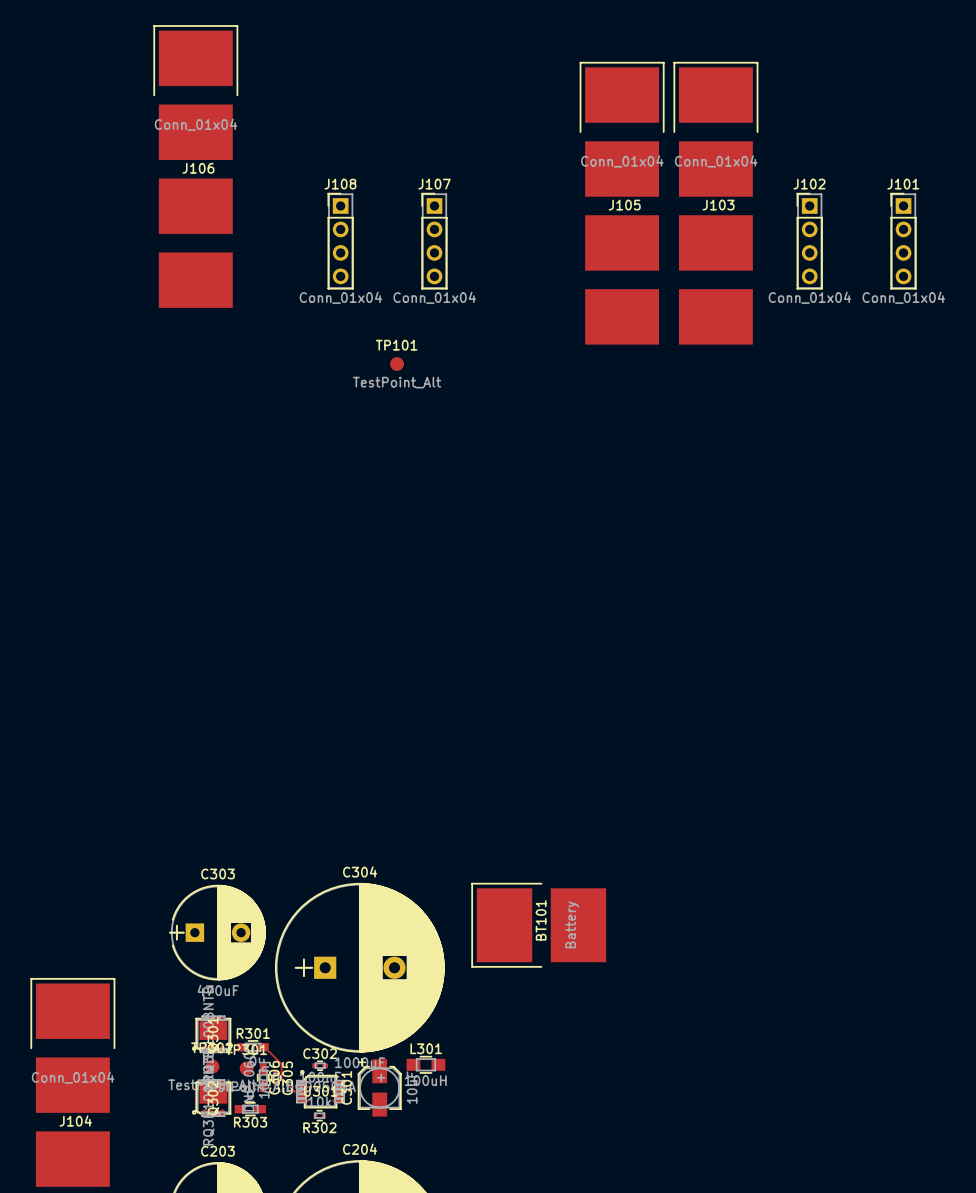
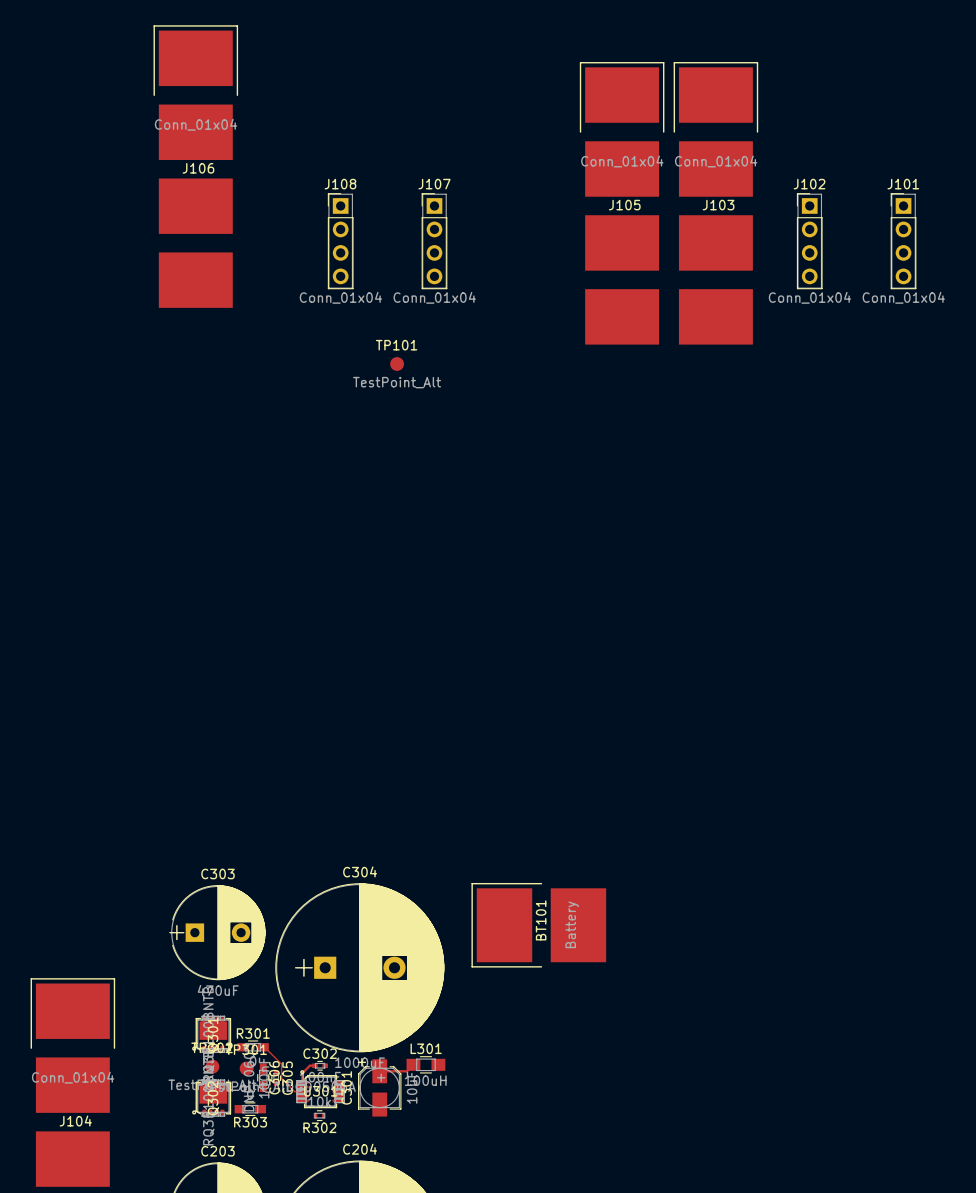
top track: none -> (413, 1064) (406, 1071) (379, 1071)
top track: none -> (315, 1065) (309, 1065) (302, 1073) (302, 1082)

